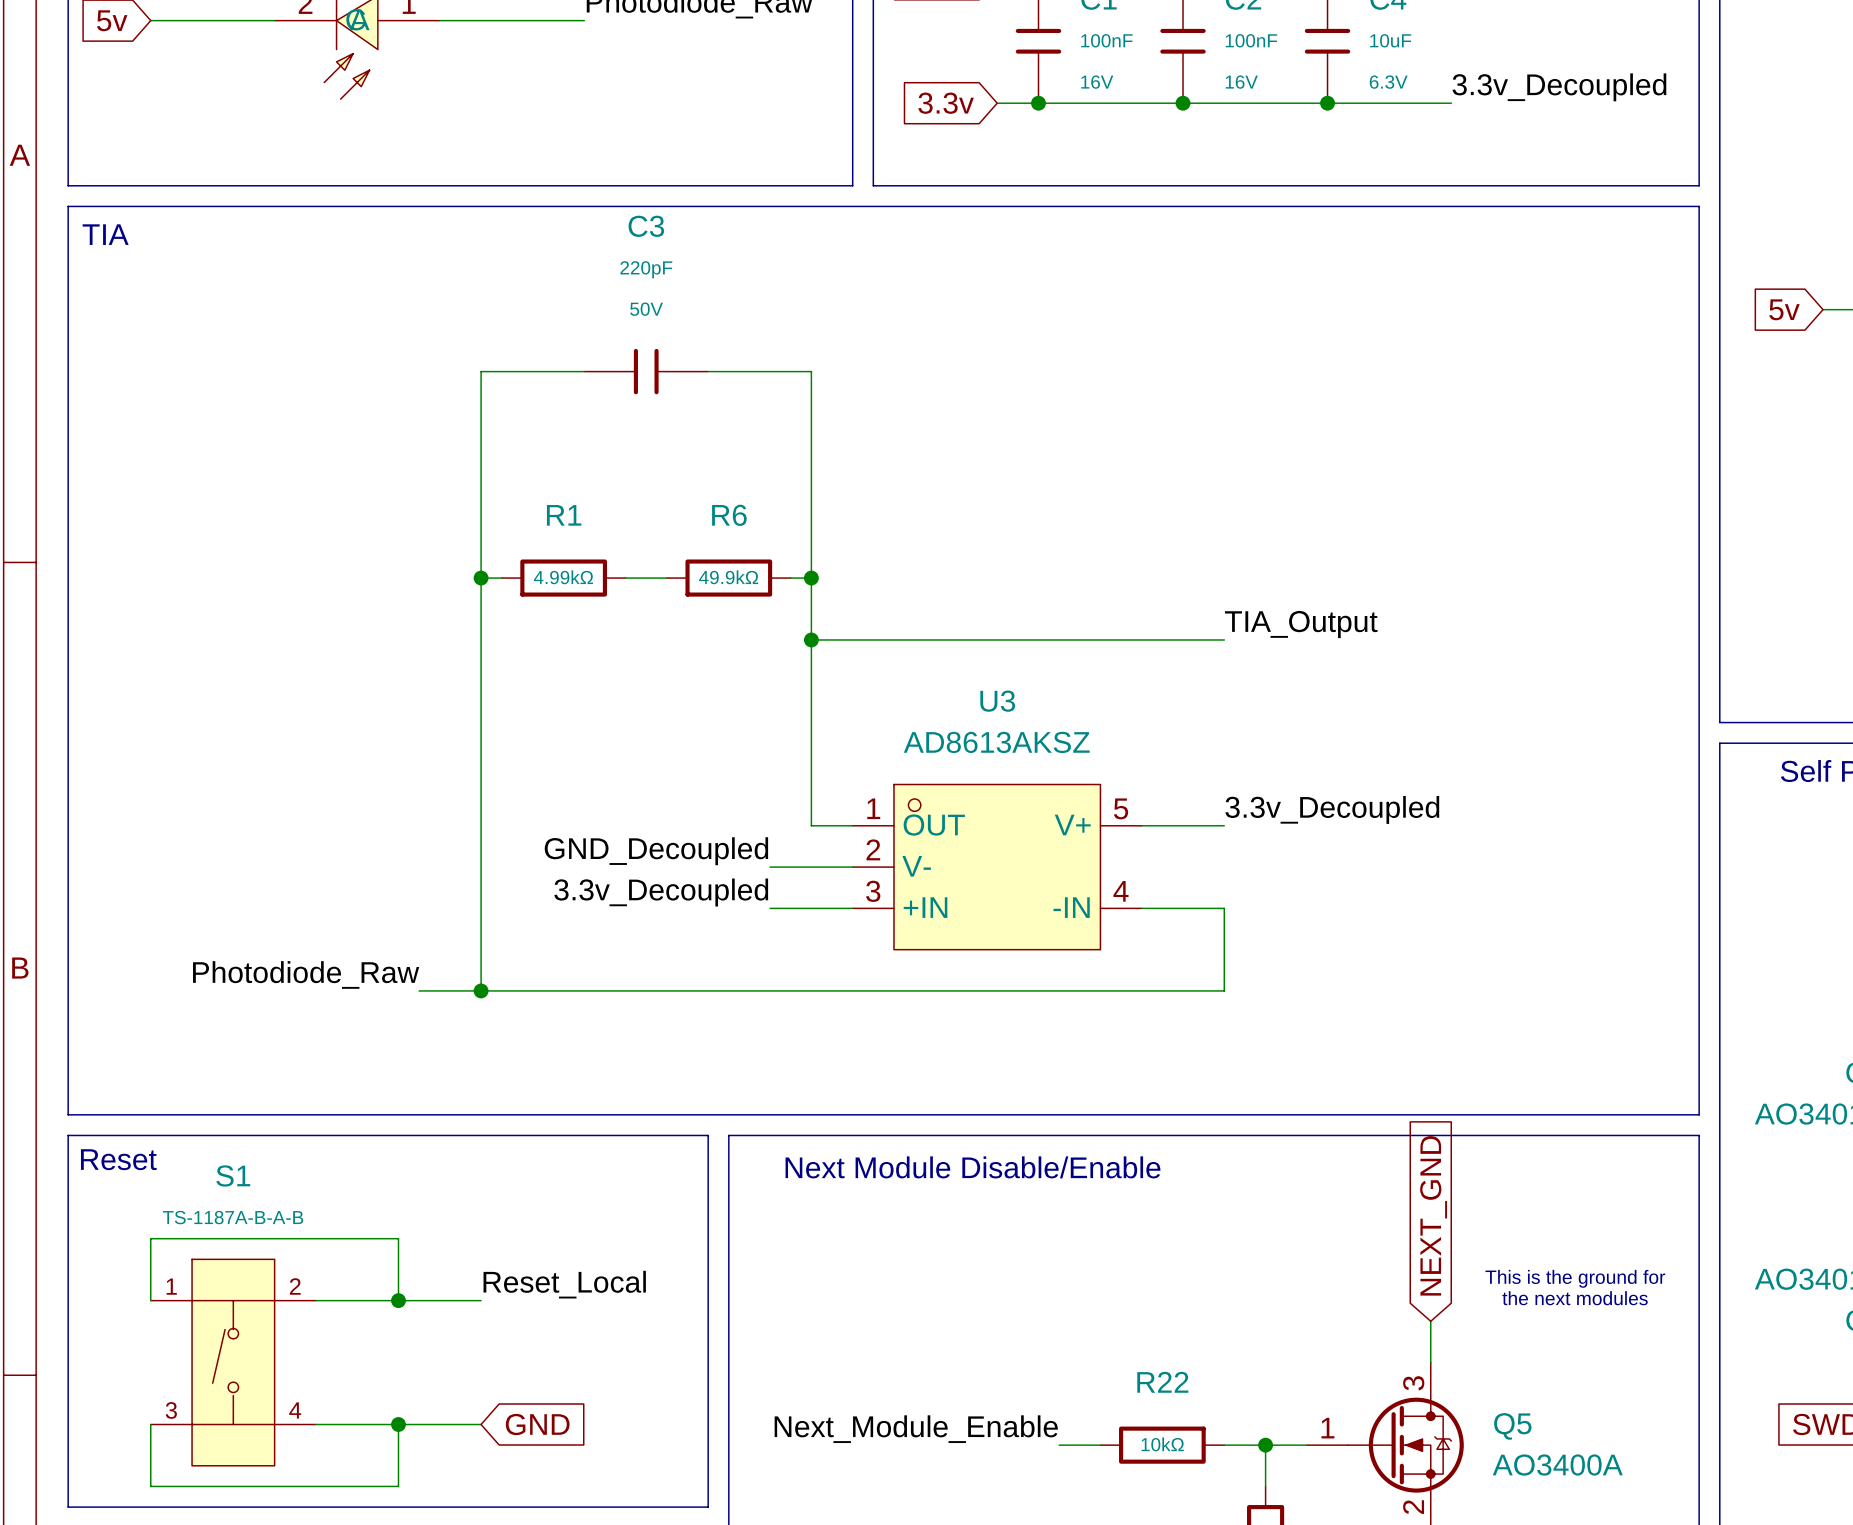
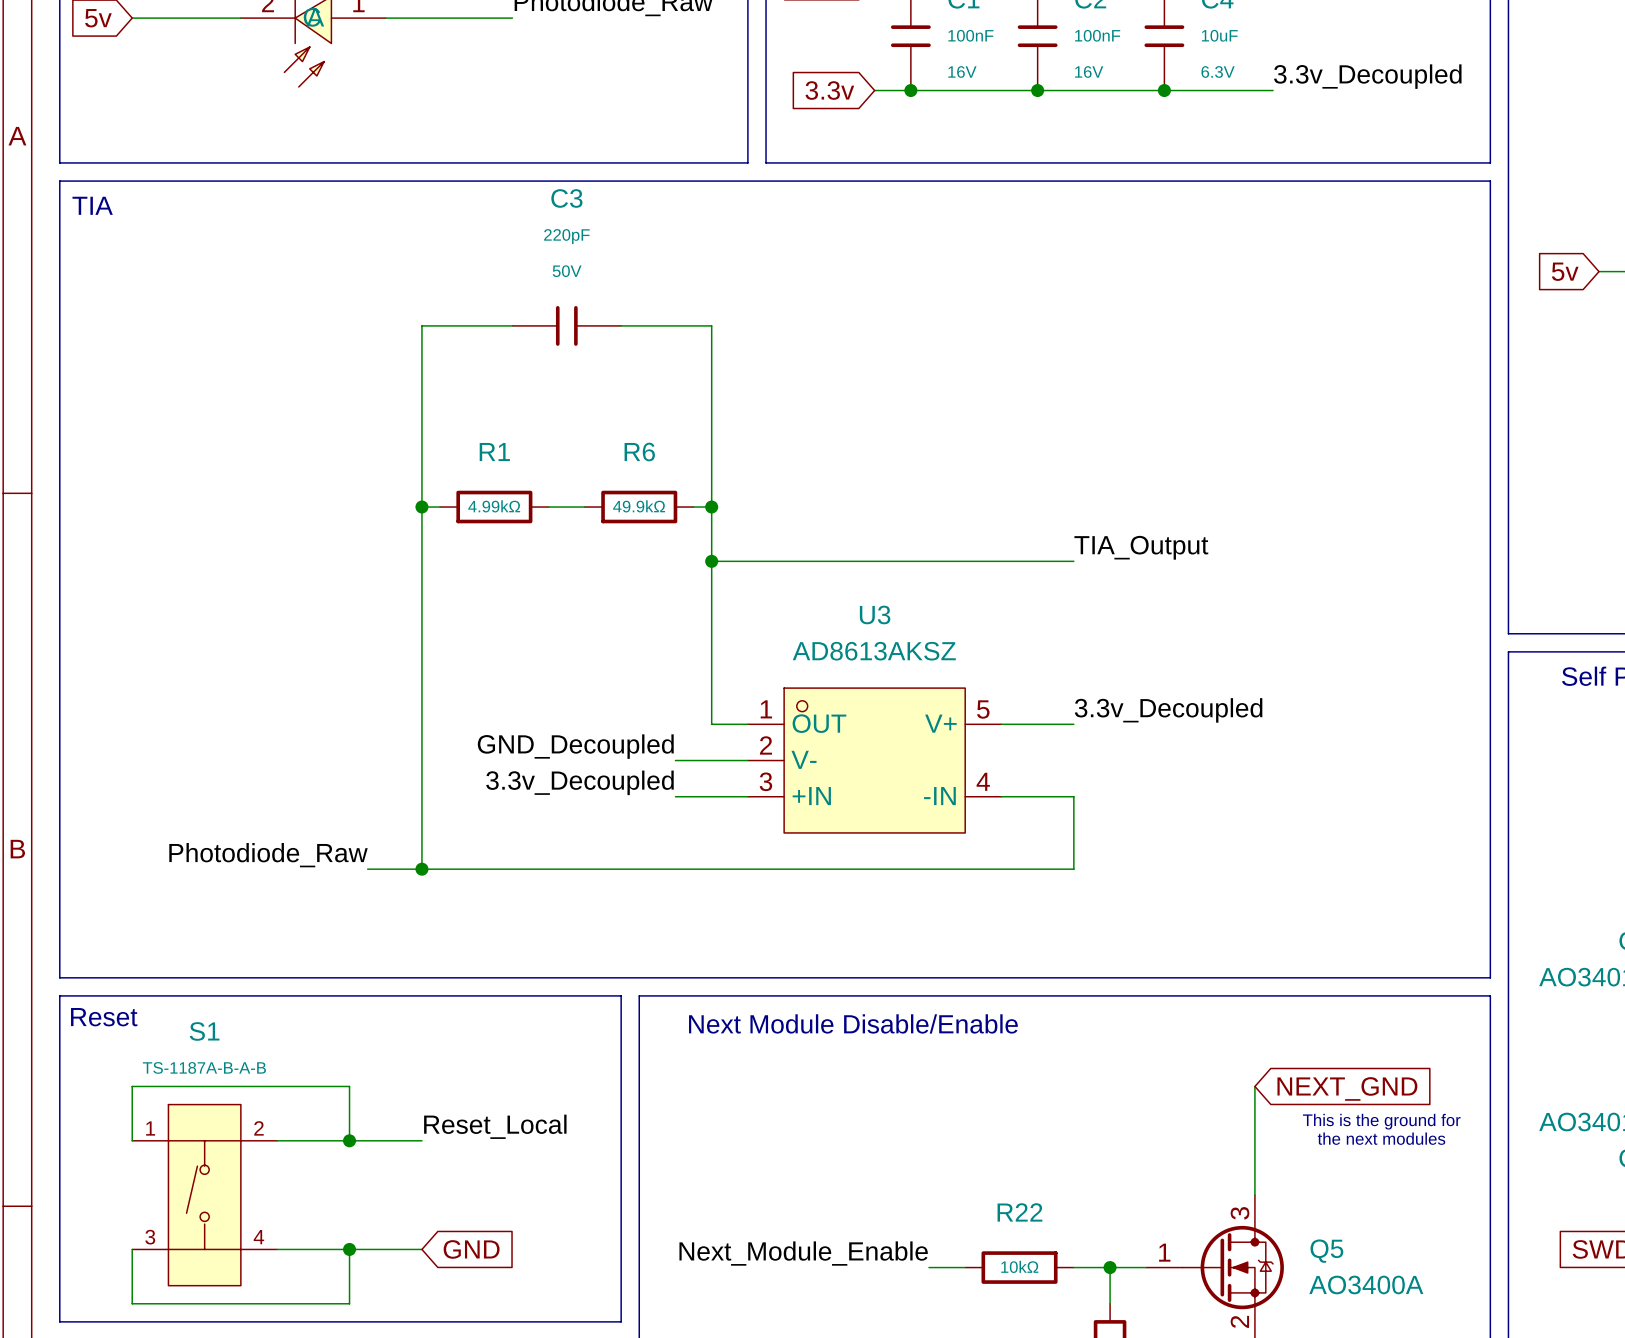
global label rotation: 0° (1433, 1215) -> 90° clockwise (1347, 1088)
wire: none -> (1254, 1086) (1254, 1158)

